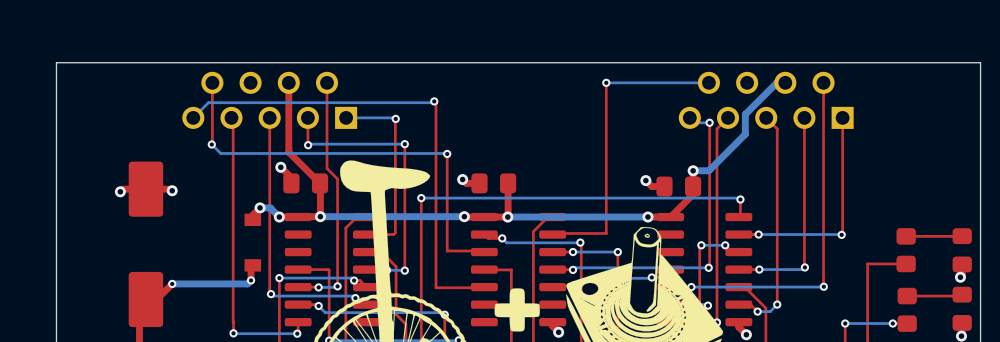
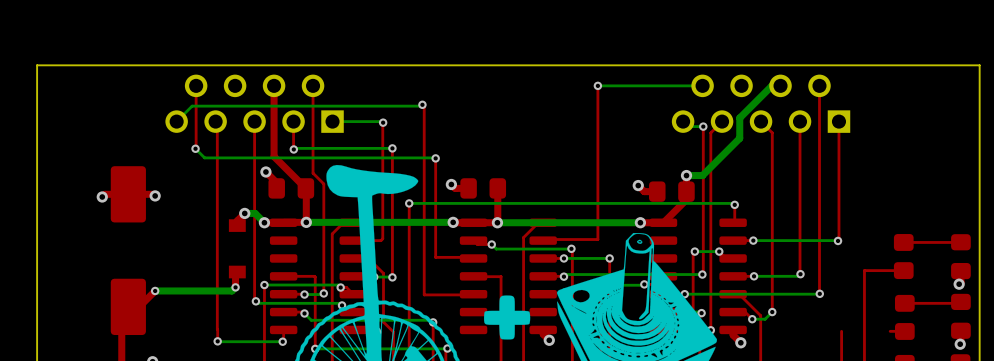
via: (845, 323) -> none
bottom track: (892, 323) (845, 323) -> none
via: (892, 323) -> none

